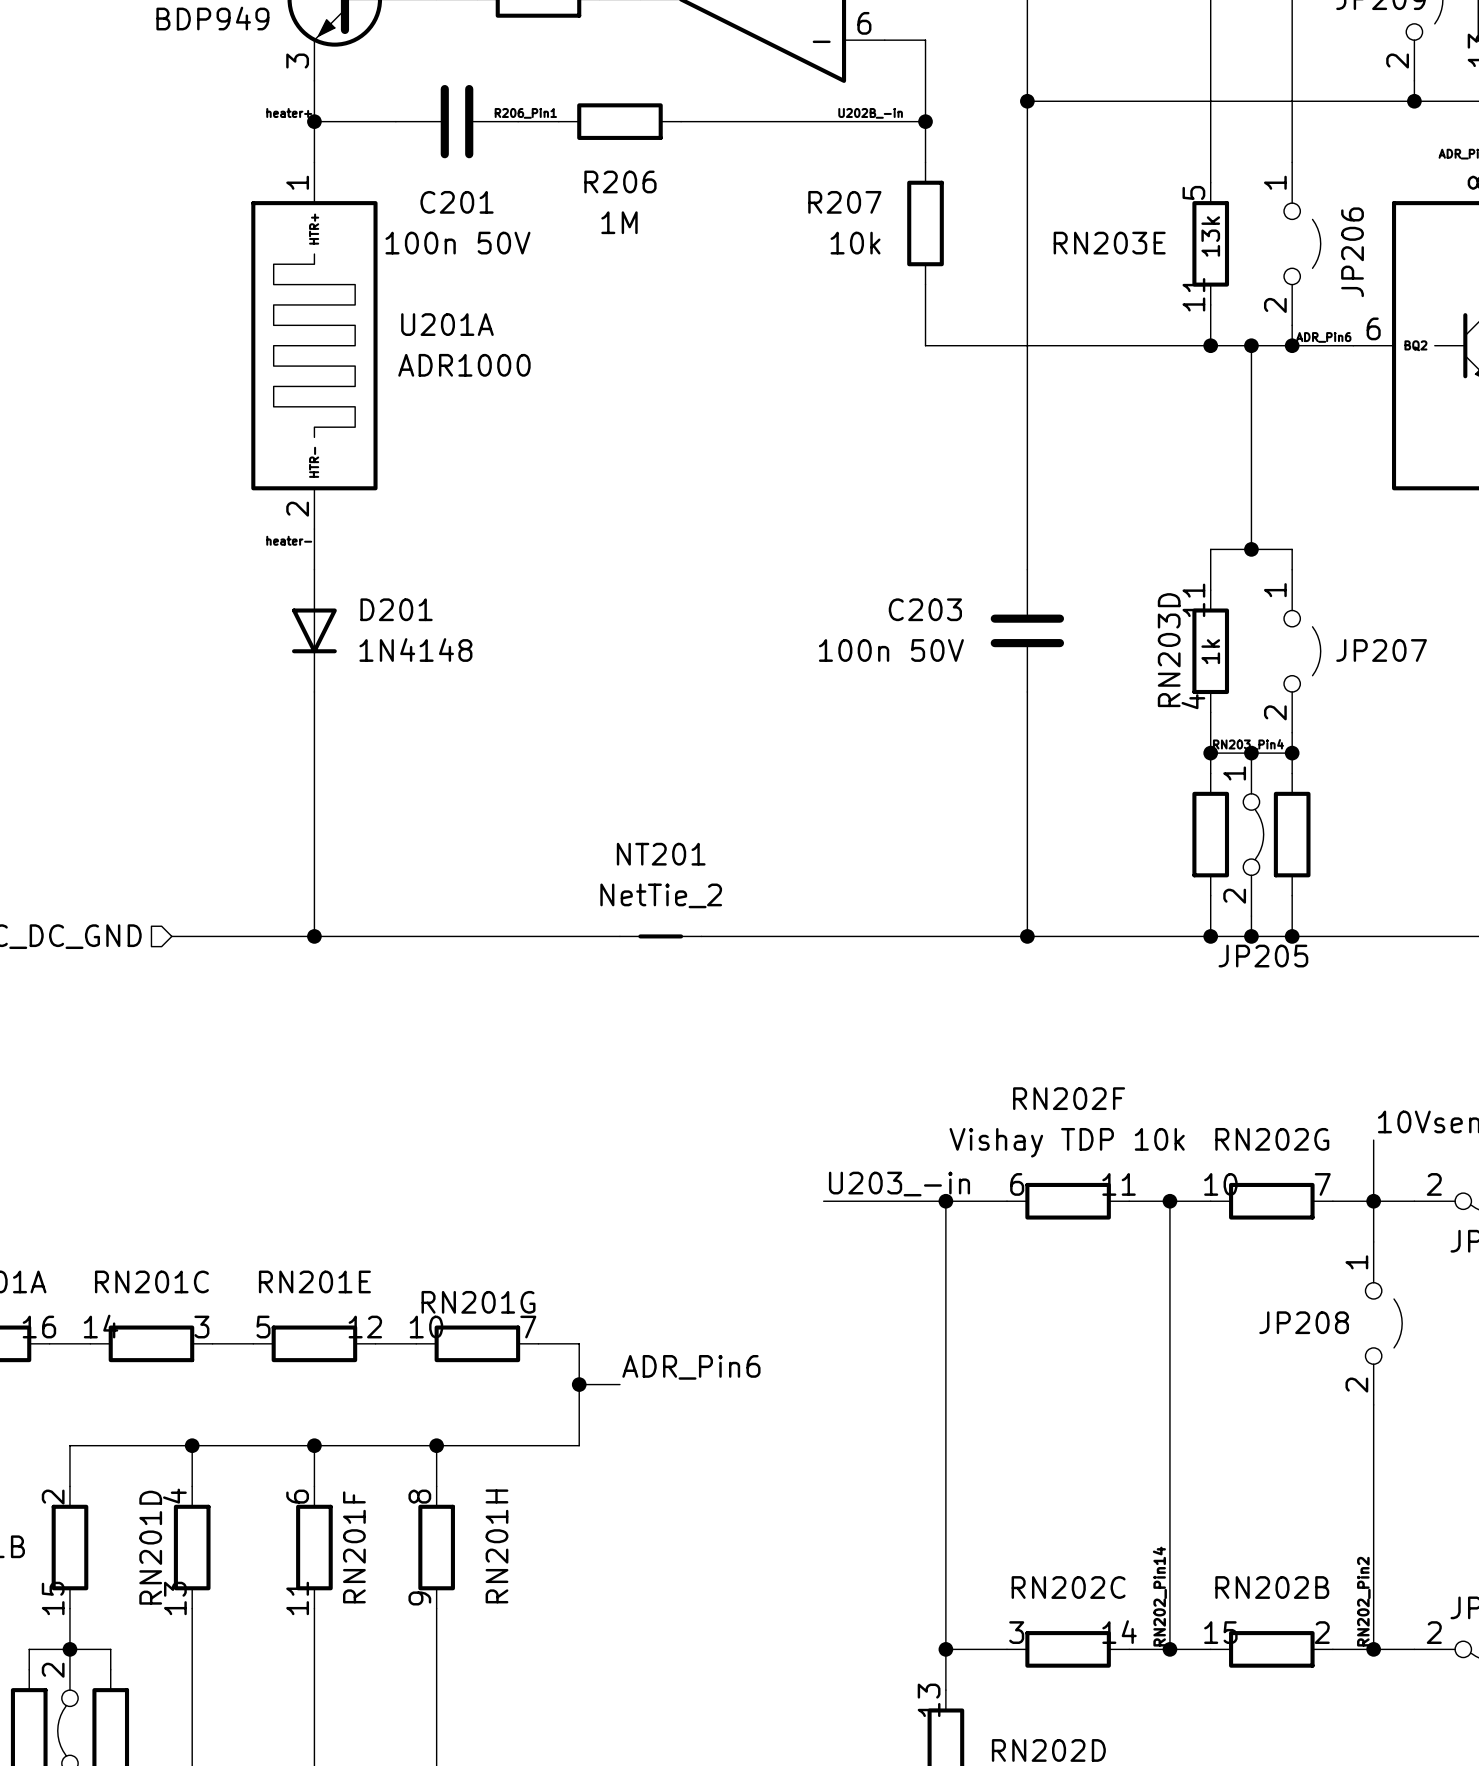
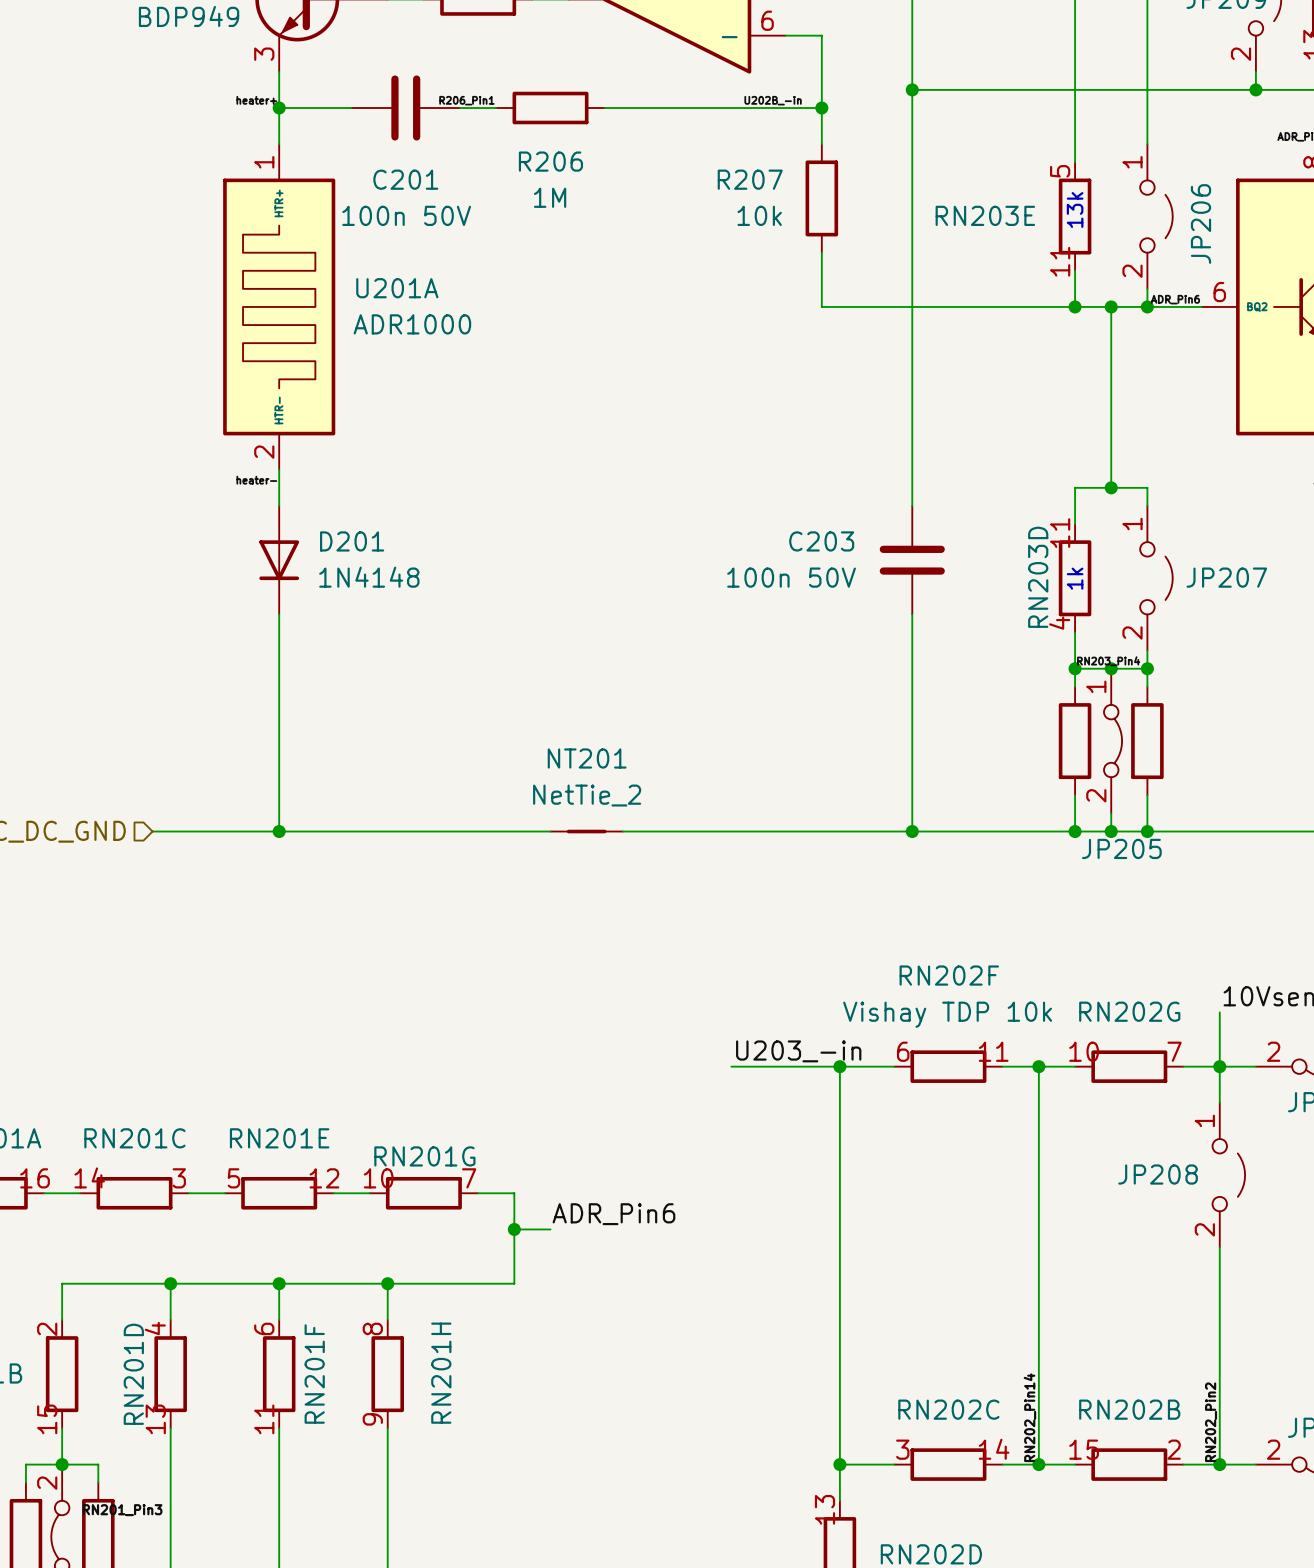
label: none -> RN201_Pin3 (122, 1510)

